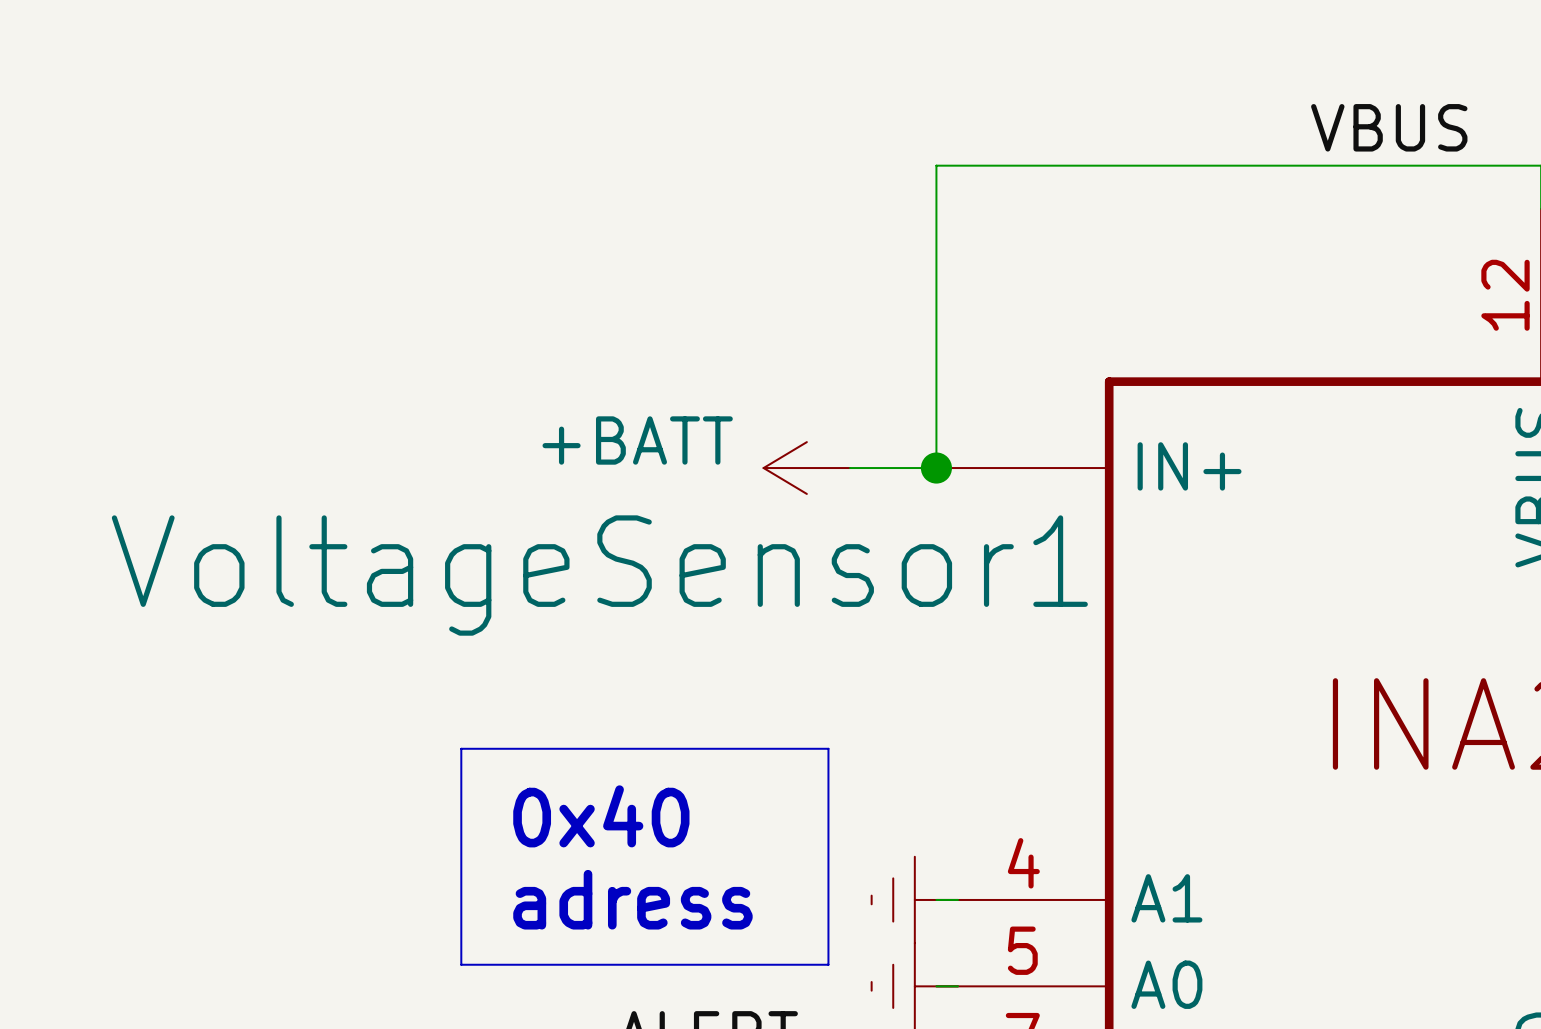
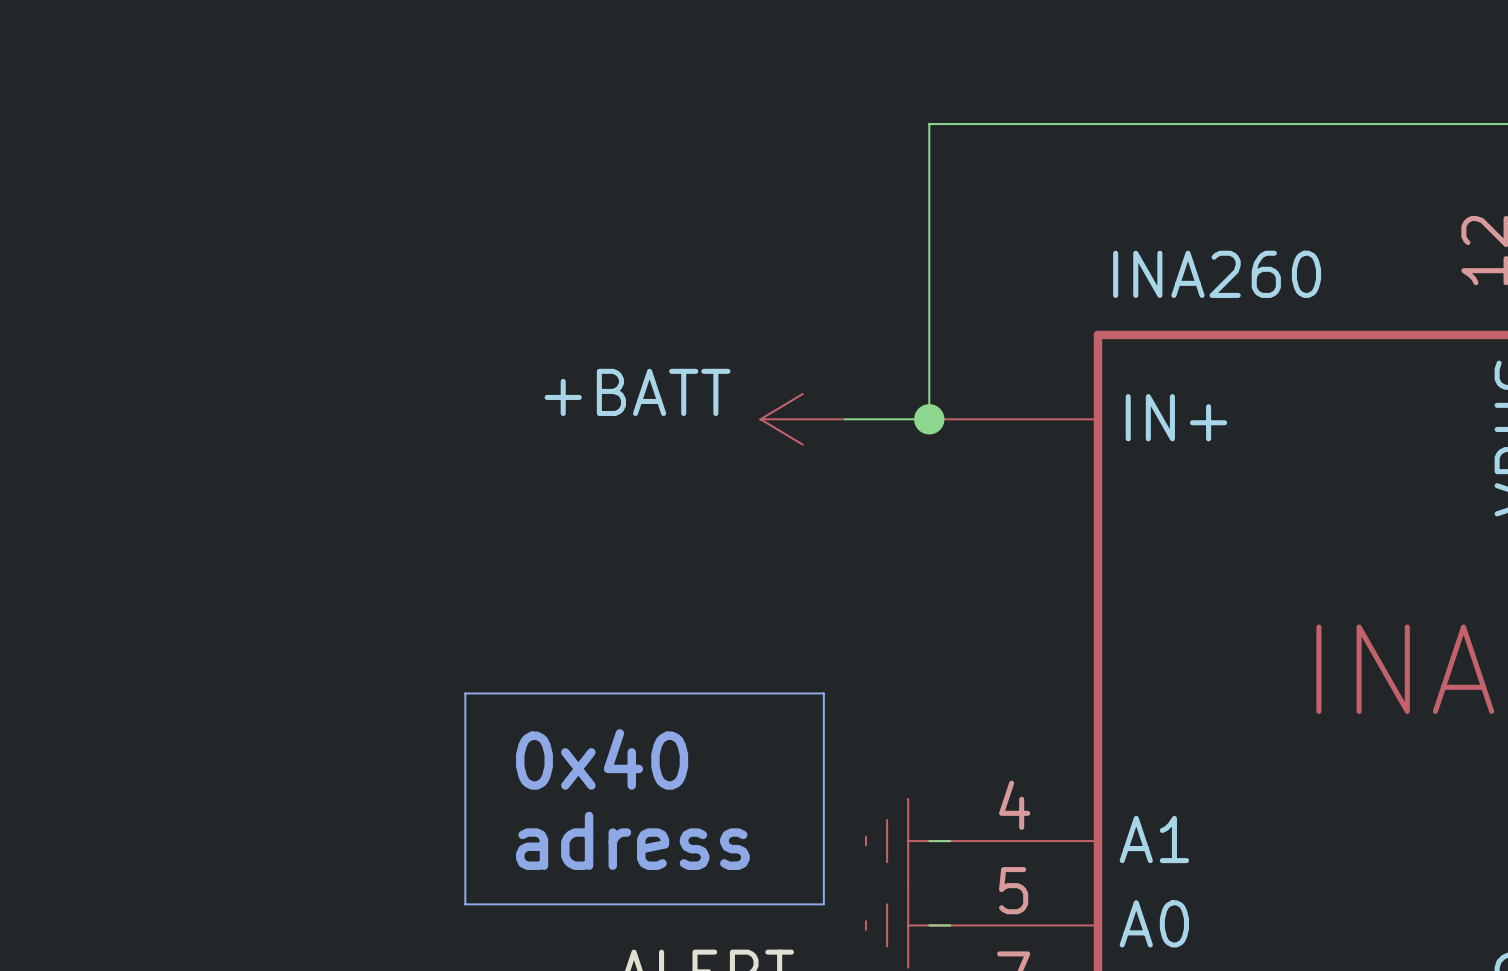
label: VBUS (1389, 127) -> none
VoltageSensor1 value: none -> INA260 (1217, 274)
VoltageSensor1 name: VoltageSensor1 (599, 575) -> none

